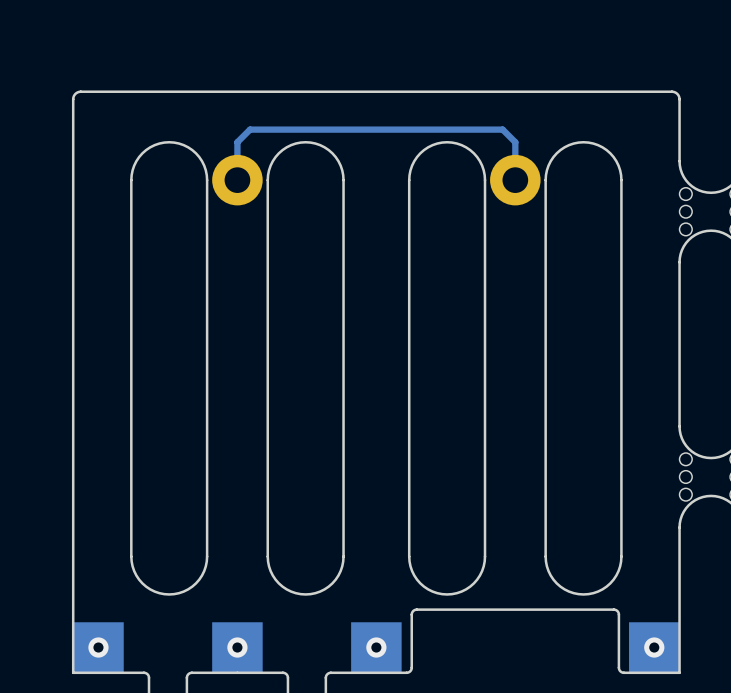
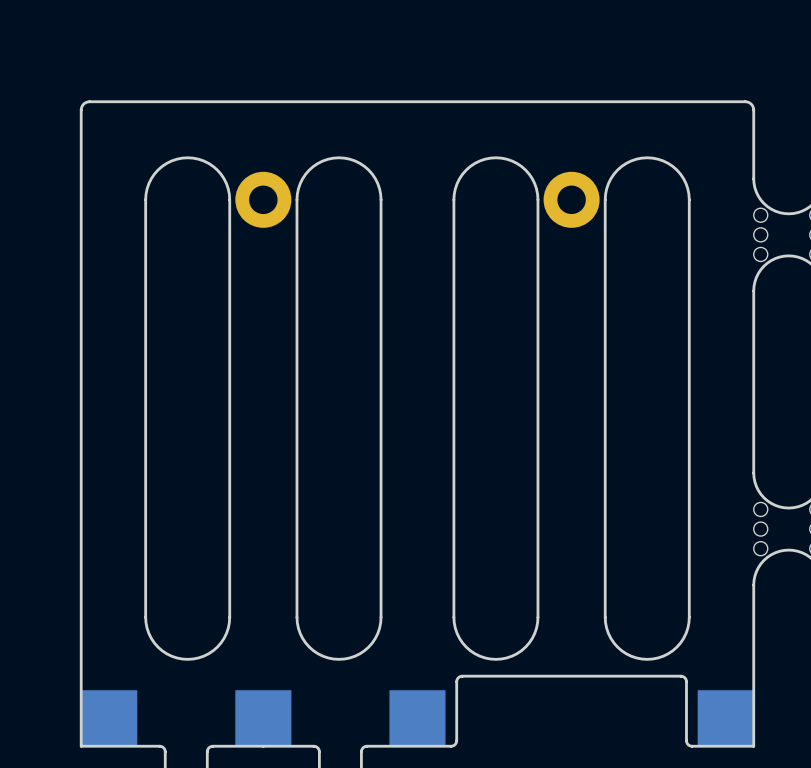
track: (515, 180) (515, 142) (502, 129) (250, 129) (237, 142) (237, 180) -> none
via: (98, 647) -> none
via: (237, 647) -> none
via: (376, 647) -> none
via: (654, 647) -> none

